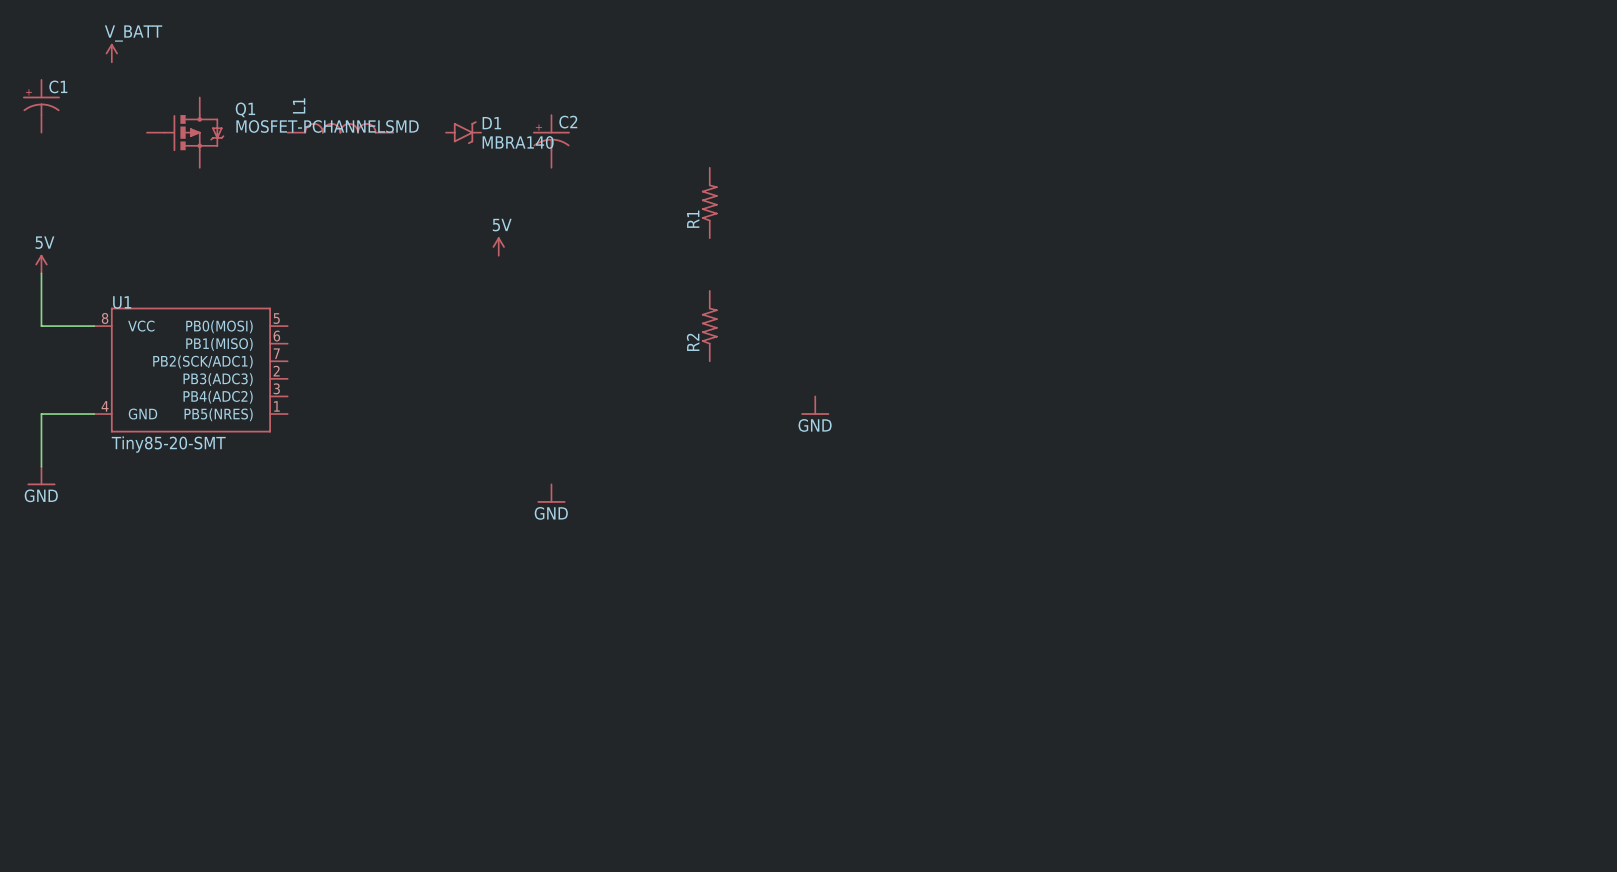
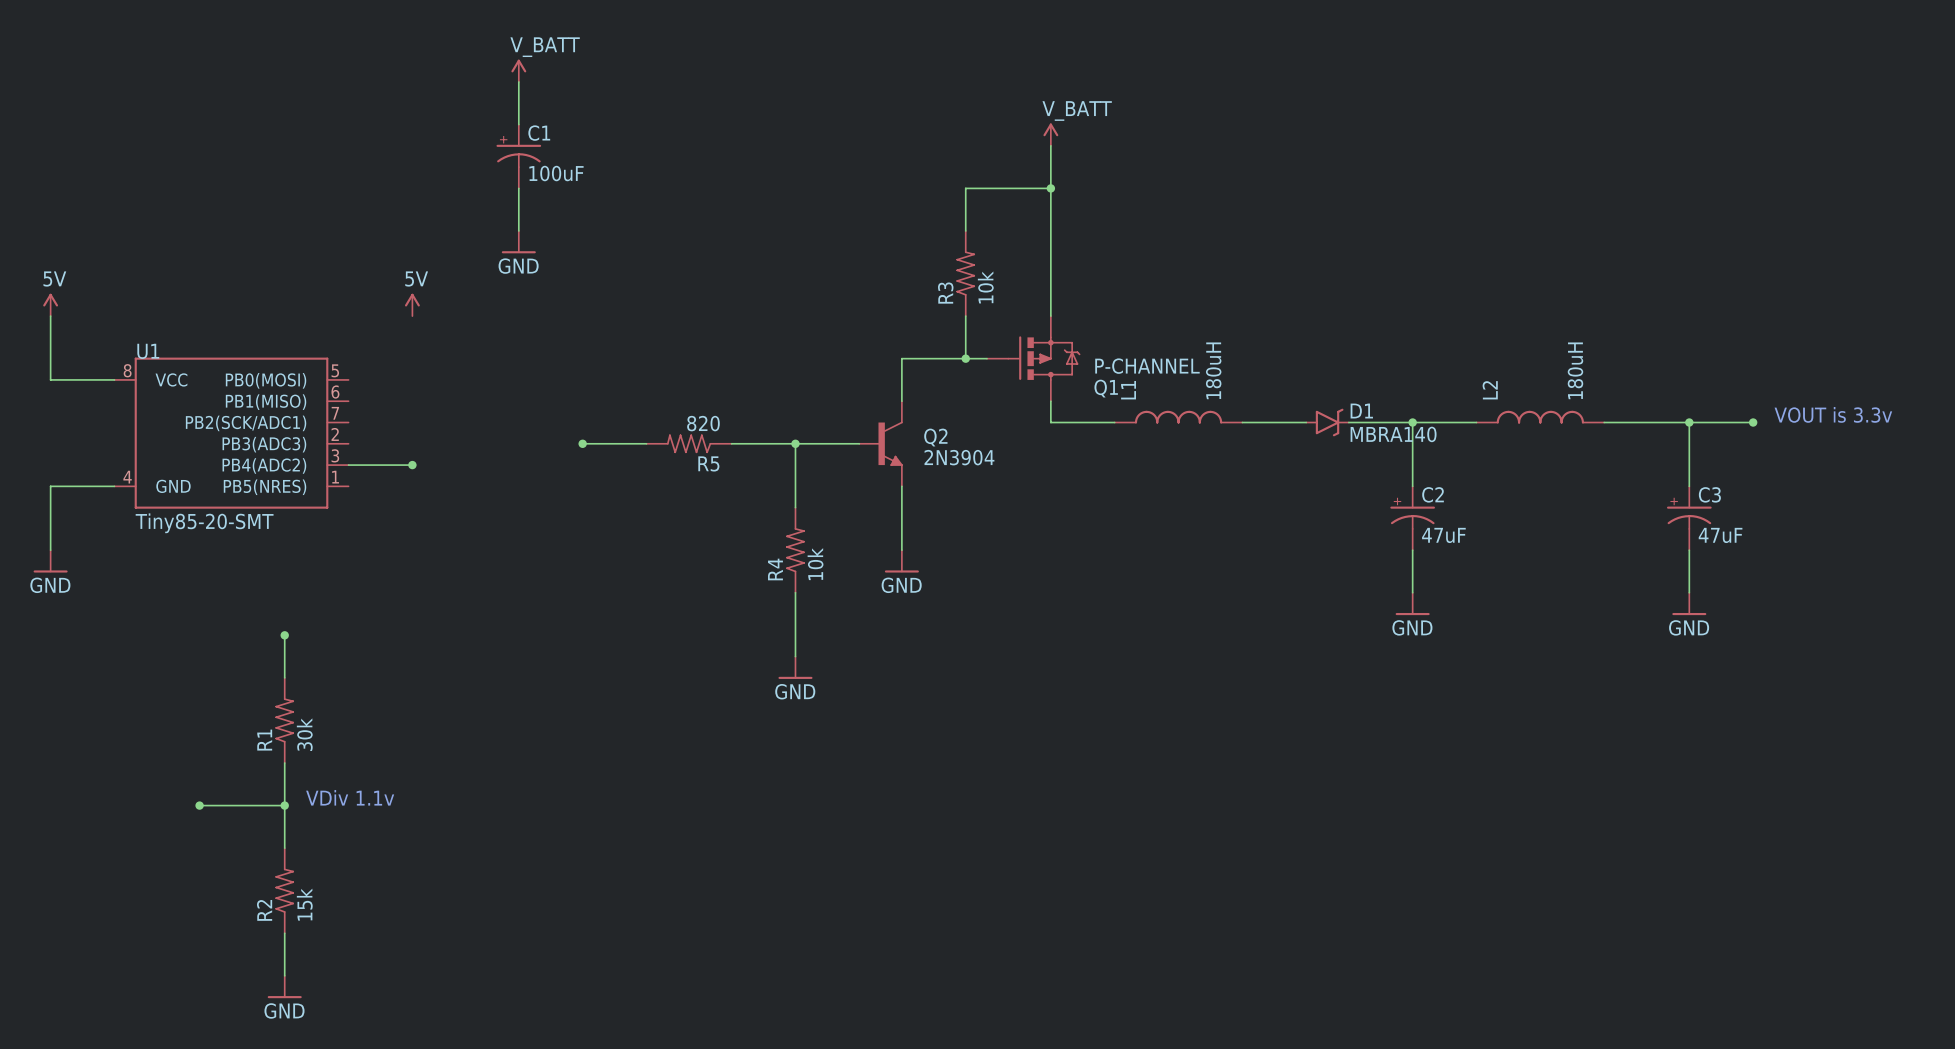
power symbol: V_BATT (111, 53) -> none
power symbol: none -> V_BATT (518, 70)
wire: none -> (518, 82) (518, 124)
C1 position: (41, 106) -> (518, 156)
power symbol: none -> V_BATT (1050, 134)
Q1 value: MOSFET-PCHANNELSMD (327, 126) -> P-CHANNEL (1147, 366)
L1 position: (340, 128) -> (1178, 417)
Q1 position: (185, 132) -> (1033, 358)
Q1 flip: as is (194, 132) -> up-down (1043, 358)
D1 position: (463, 132) -> (1327, 422)
wire: none -> (1050, 145) (1050, 316)
C2 position: (551, 141) -> (1412, 518)
C1 value: none -> 100uF (556, 173)
wire: none -> (518, 188) (518, 230)
wire: none -> (1050, 188) (965, 188) (965, 230)
junction: none -> (1050, 188)
R1 position: (709, 202) -> (284, 720)
power symbol: none -> GND (518, 242)
R3: none -> 10k (965, 273)
power symbol position: 5V (498, 246) -> 5V (412, 304)
wire: none -> (965, 316) (965, 358)
junction: none -> (965, 358)
wire: none -> (987, 358) (901, 358) (901, 401)
L1 value: none -> 180uH (1213, 370)
R2 position: (709, 326) -> (284, 890)
wire: none -> (1050, 401) (1050, 422) (1114, 422)
text: none -> VOUT is 3.3v (1833, 414)
L2: none -> 180uH (1540, 417)
wire: none -> (1242, 422) (1306, 422)
wire: none -> (1348, 422) (1476, 422)
wire: none -> (1412, 422) (1412, 486)
junction: none -> (1412, 422)
wire: none -> (1604, 422) (1753, 422)
wire: none -> (1689, 422) (1689, 486)
junction: none -> (1689, 422)
junction: none -> (1753, 422)
wire: none -> (582, 443) (646, 443)
junction: none -> (582, 443)
R5: none -> 820 (689, 443)
wire: none -> (731, 443) (859, 443)
wire: none -> (795, 443) (795, 507)
junction: none -> (795, 443)
Q2: none -> 2N3904 (880, 443)
wire: none -> (348, 465) (412, 465)
junction: none -> (412, 465)
power symbol: GND (815, 405) -> none
wire: none -> (901, 486) (901, 550)
C3: none -> 47uF (1689, 518)
C2 value: none -> 47uF (1443, 535)
R4: none -> 10k (795, 550)
wire: none -> (1412, 550) (1412, 592)
wire: none -> (1689, 550) (1689, 592)
power symbol: none -> GND (901, 561)
power symbol: GND (551, 493) -> none
wire: none -> (795, 592) (795, 656)
power symbol: none -> GND (1412, 603)
power symbol: none -> GND (1689, 603)
wire: none -> (284, 635) (284, 677)
junction: none -> (284, 635)
power symbol: none -> GND (795, 667)
R1 value: none -> 30k (304, 734)
wire: none -> (284, 763) (284, 848)
text: none -> VDiv 1.1v (350, 797)
wire: none -> (199, 805) (284, 805)
junction: none -> (199, 805)
junction: none -> (284, 805)
R2 value: none -> 15k (304, 904)
wire: none -> (284, 933) (284, 975)
power symbol: none -> GND (284, 987)

